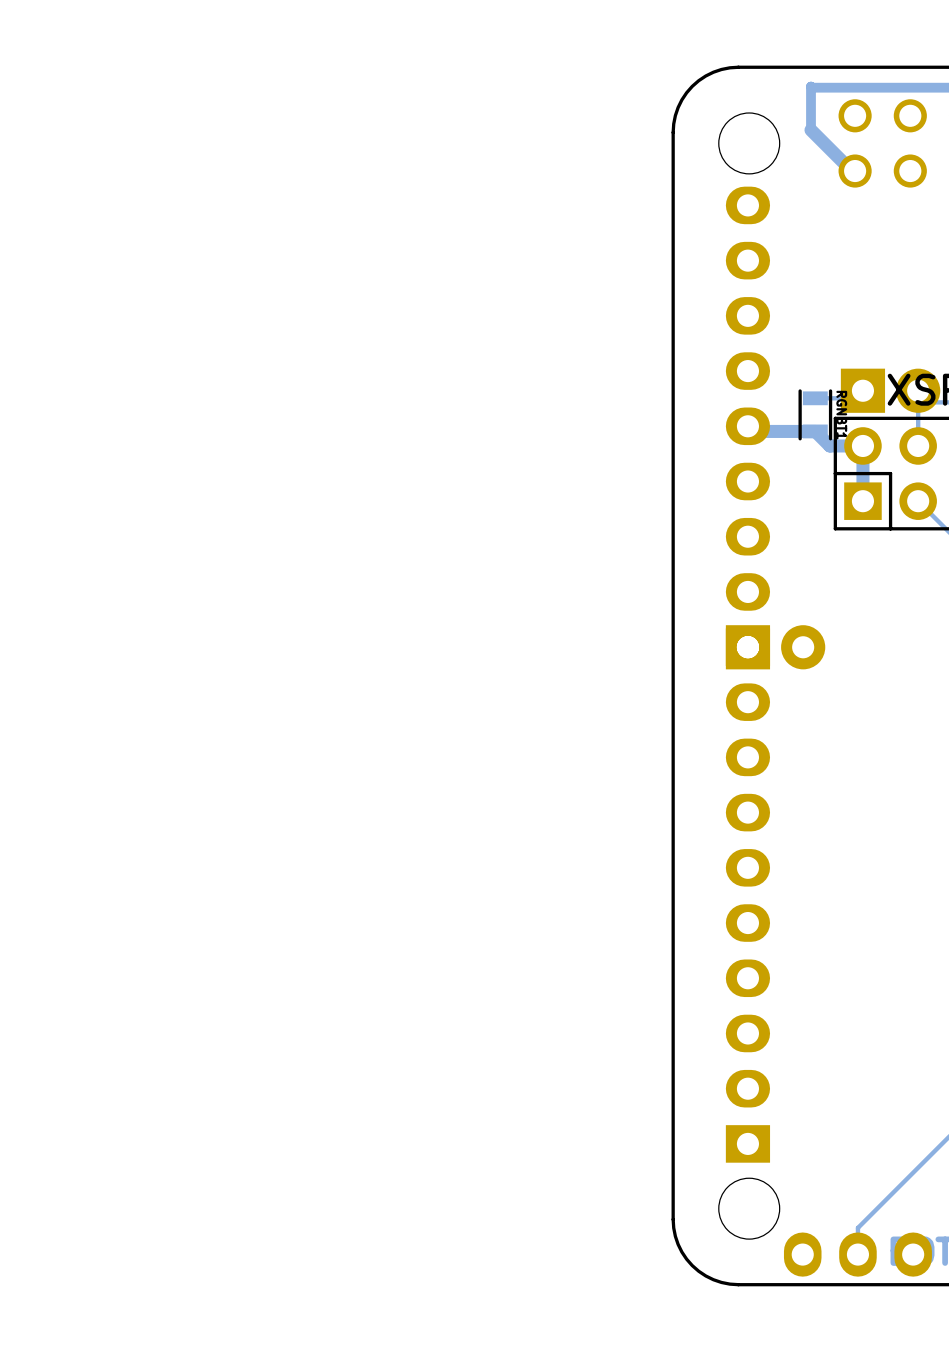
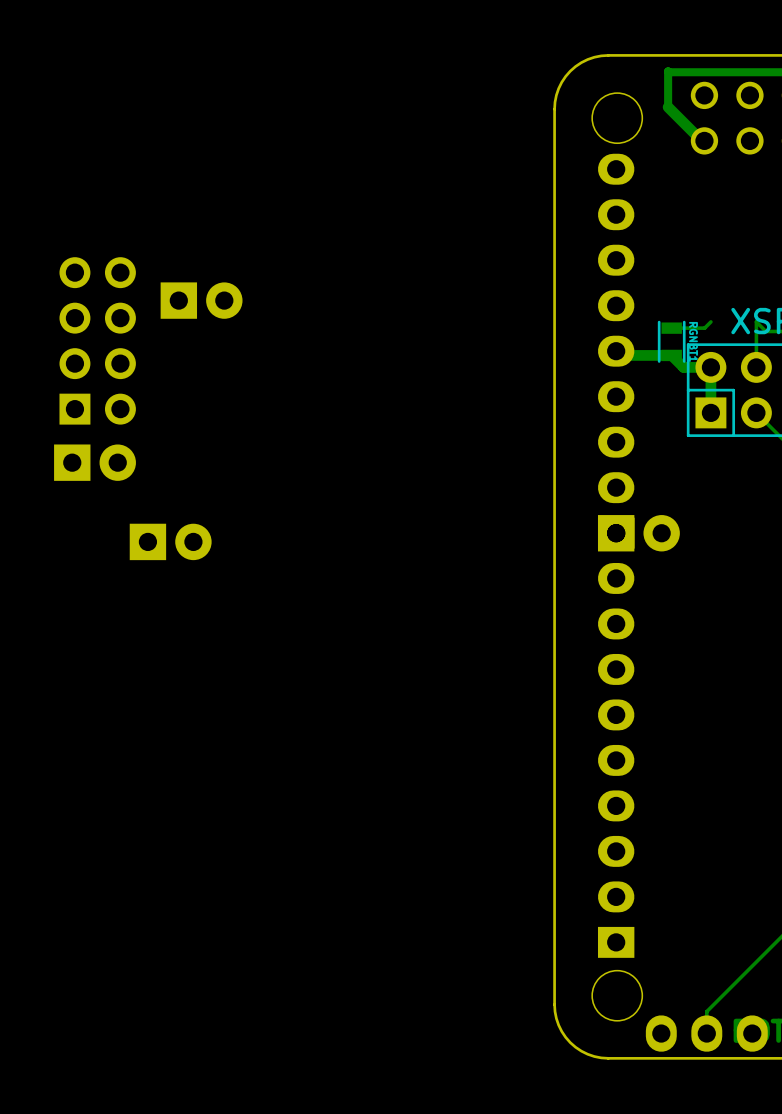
part: none -> (201, 300)
part: (890, 390) -> none
part: none -> (97, 340)
part: none -> (95, 462)
part: none -> (170, 541)

